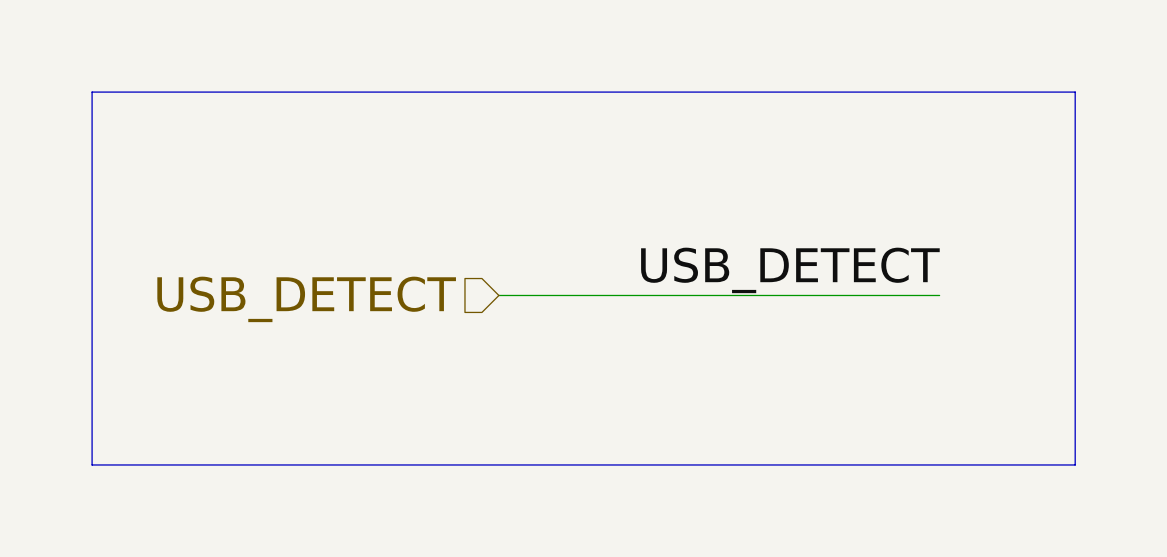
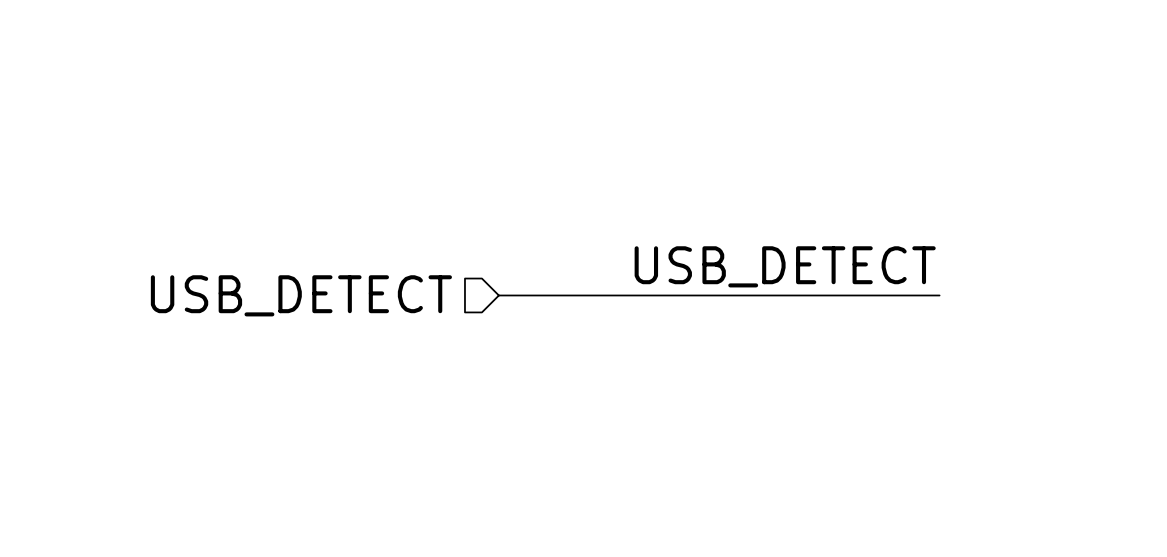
line: (92, 92) (1075, 92) (1075, 464) (92, 464) (92, 92) -> none

